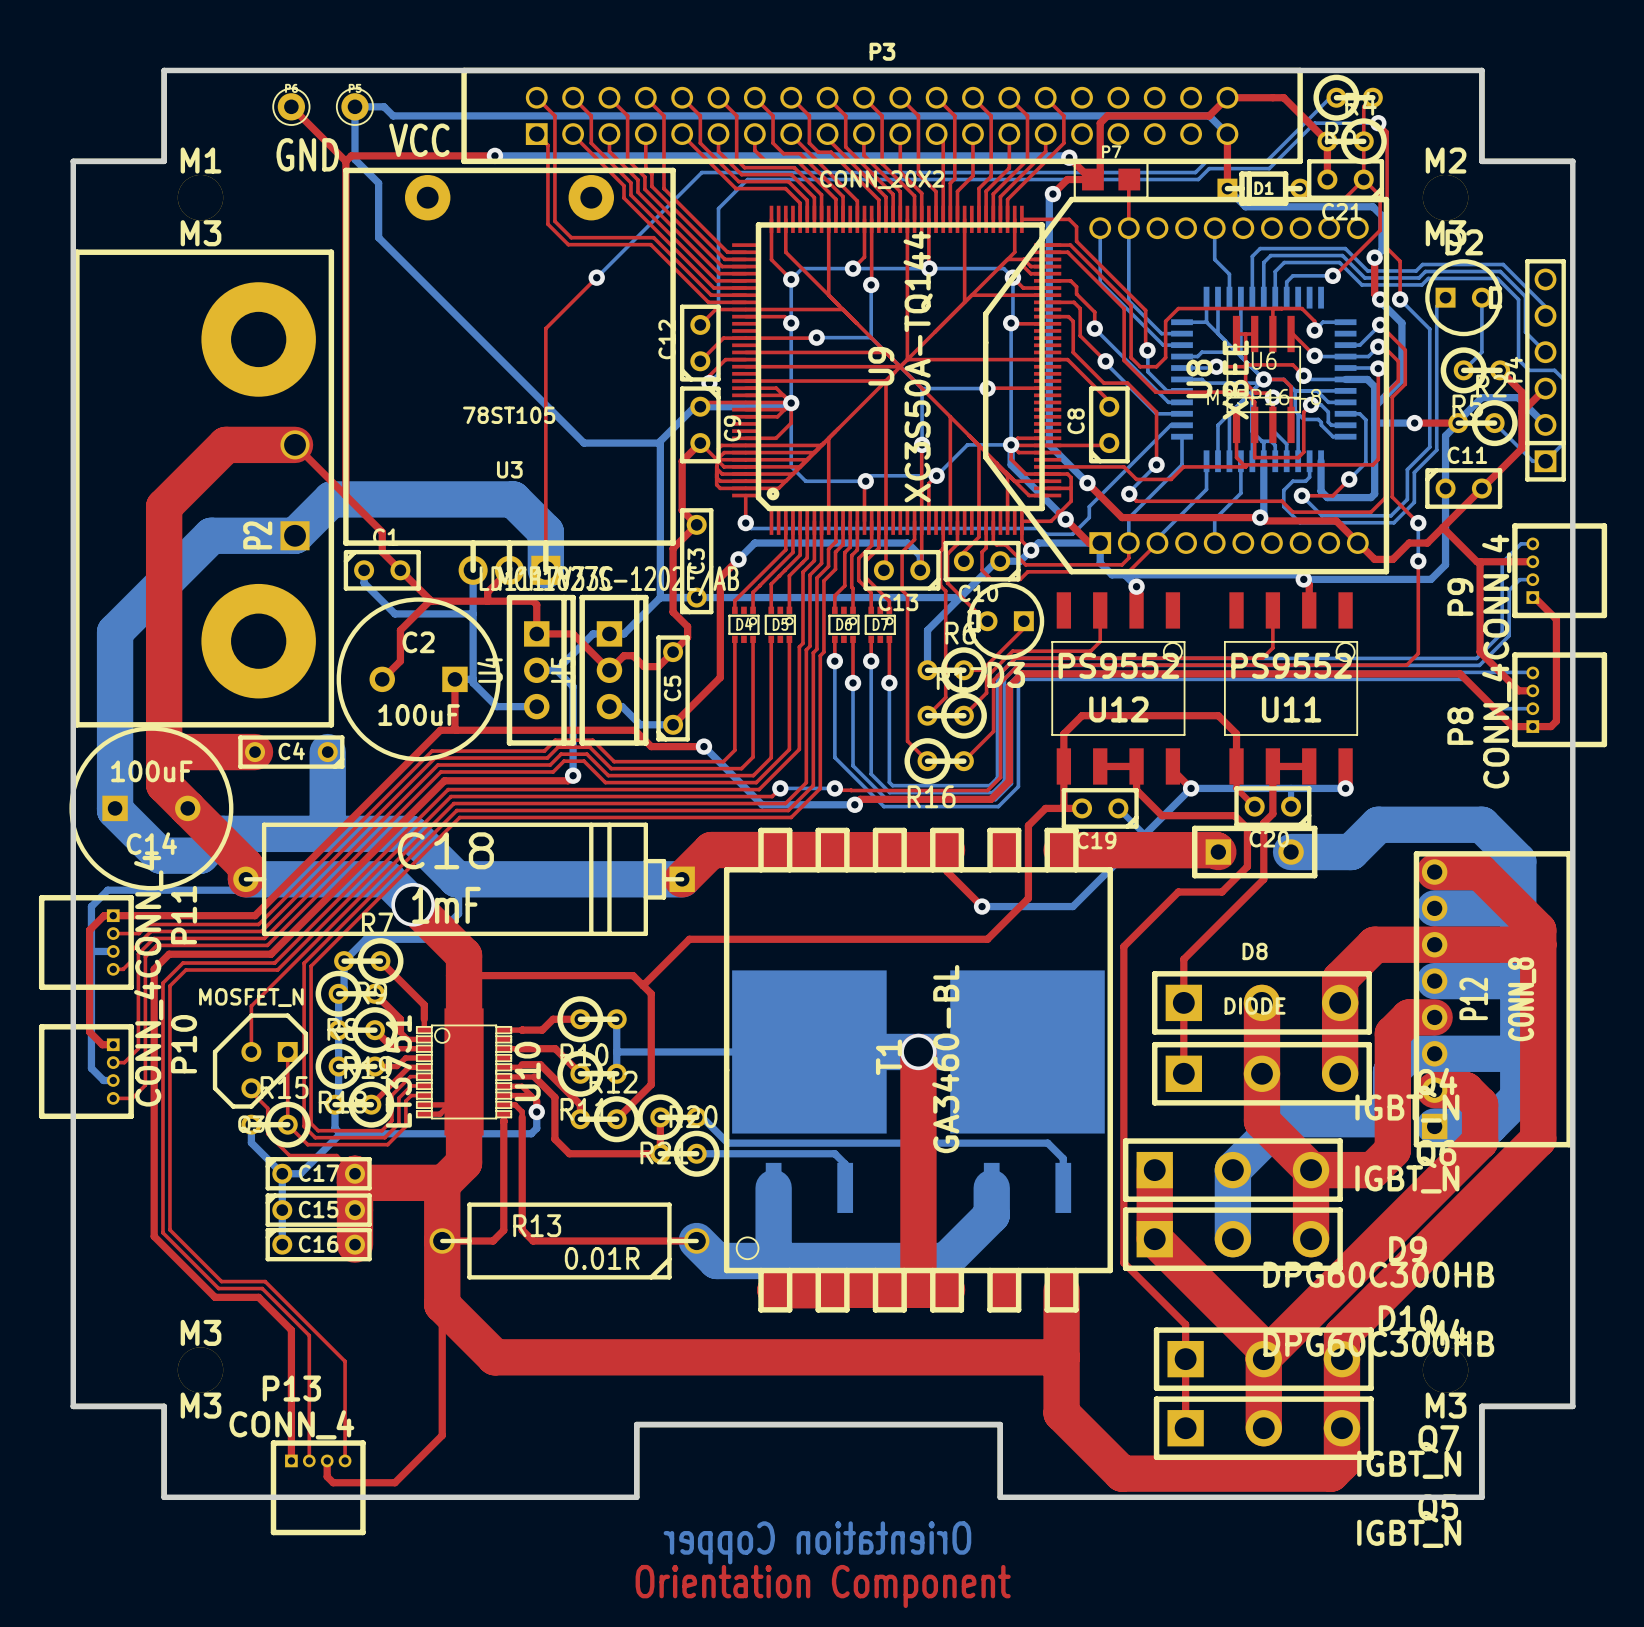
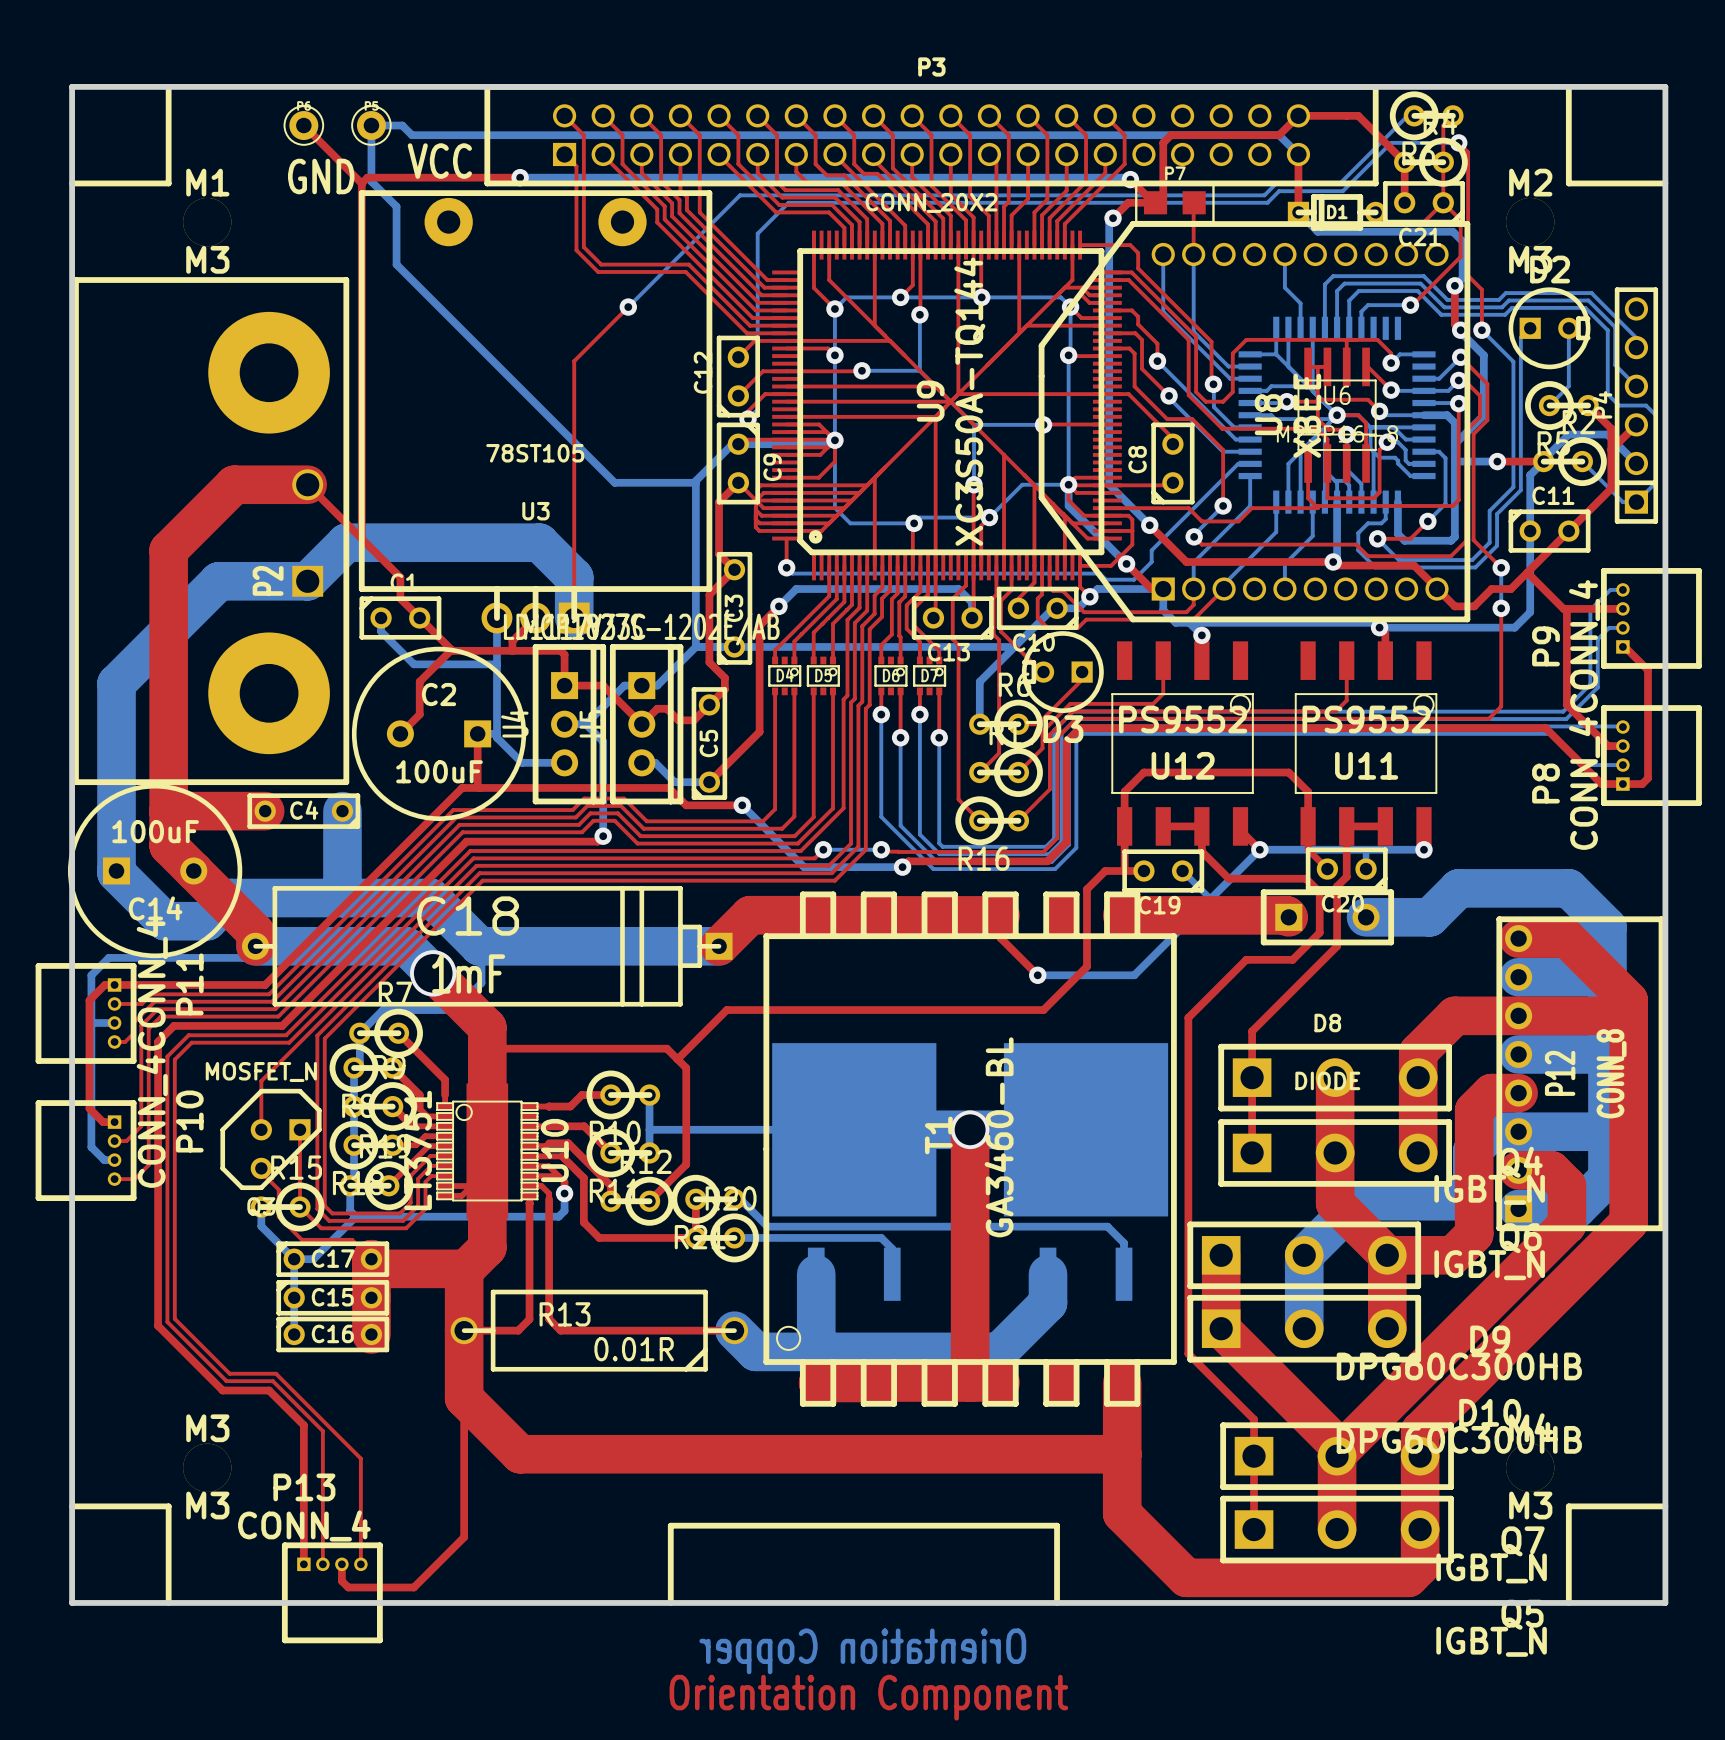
board edge: (164, 70) (164, 161) (73, 161) -> (168, 86) (72, 86) (72, 183)
board edge: (1481, 70) (1481, 161) (1572, 161) -> (1568, 86) (1665, 86) (1665, 183)
board edge: (73, 1406) (164, 1406) (164, 1497) -> (72, 1506) (72, 1602) (168, 1602)
board edge: (1572, 1406) (1481, 1406) (1481, 1497) -> (1665, 1506) (1665, 1602) (1568, 1602)
board edge: (636, 1497) (636, 1424) (1000, 1424) (1000, 1497) -> (670, 1602) (1057, 1602)

